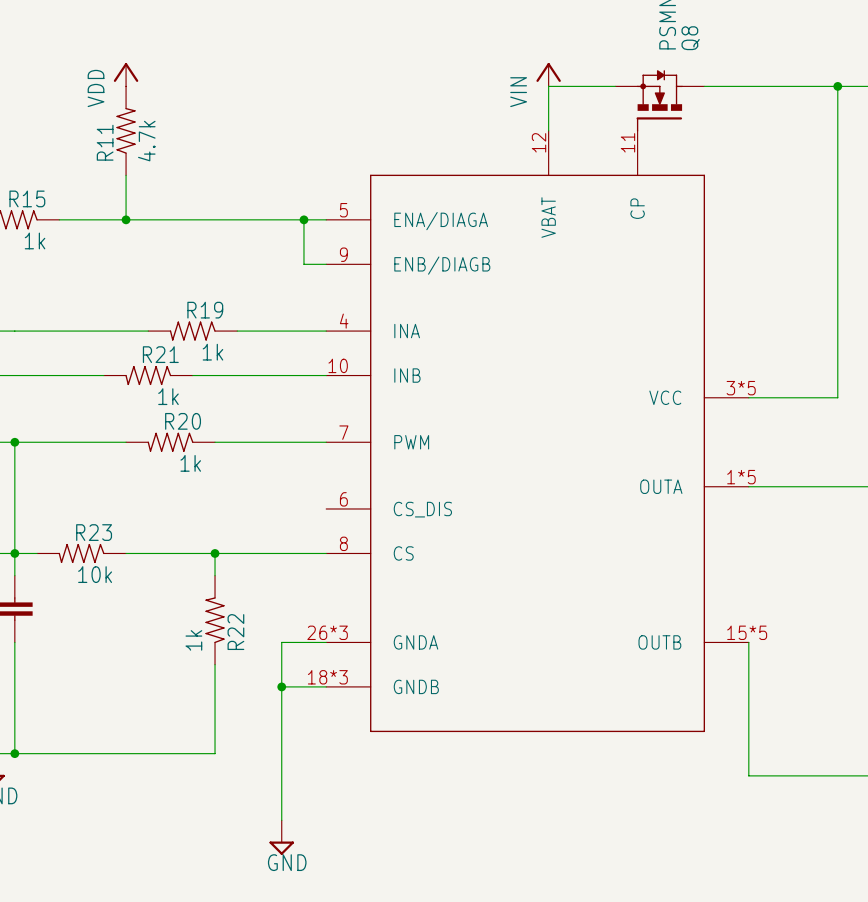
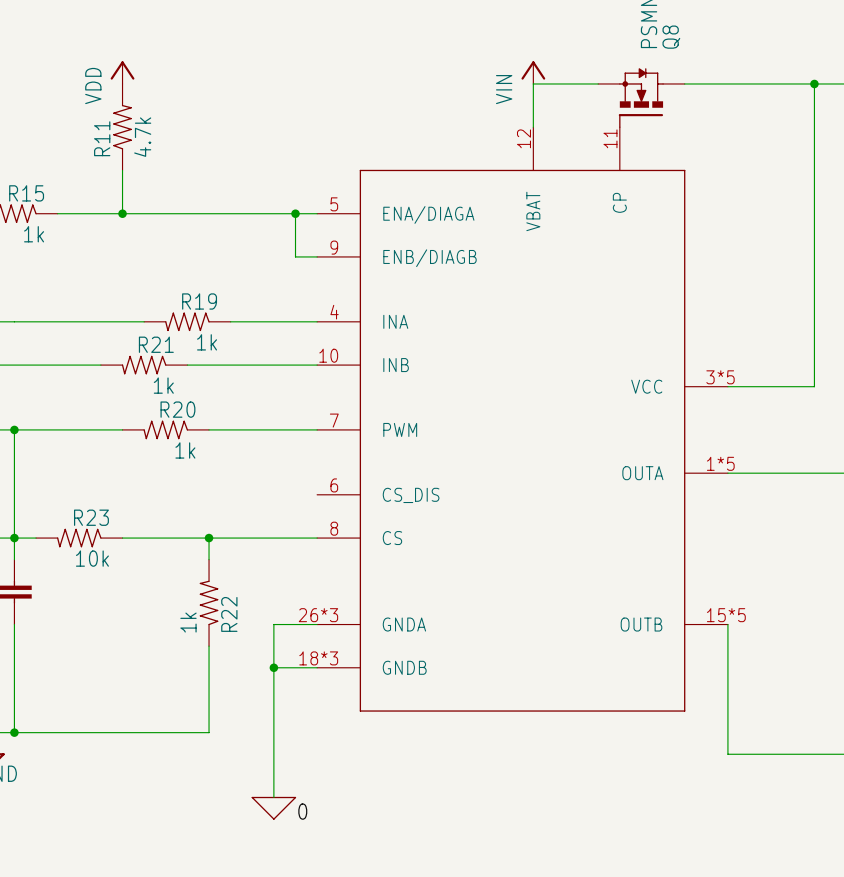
power symbol shape: [269, 820, 294, 855] -> [251, 796, 297, 820]
label: none -> 0 (302, 811)
power symbol text: GND (287, 862) -> none

